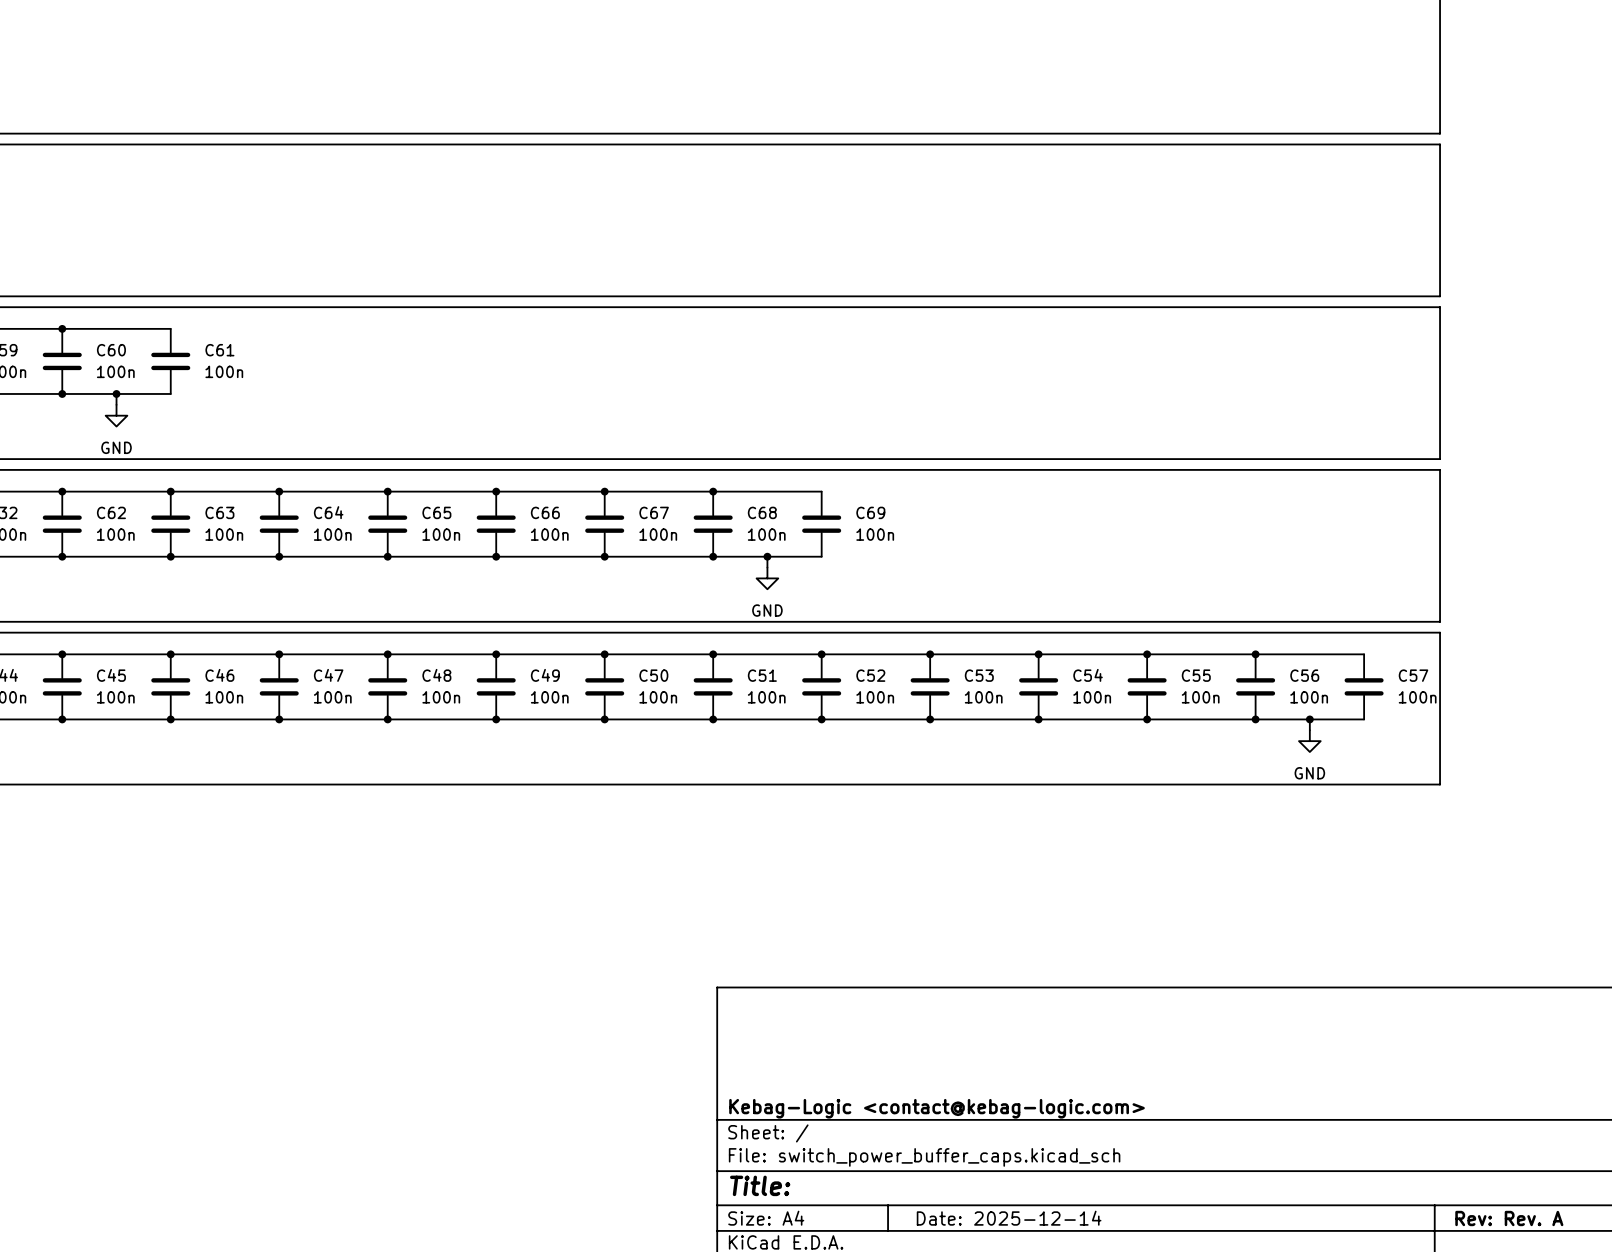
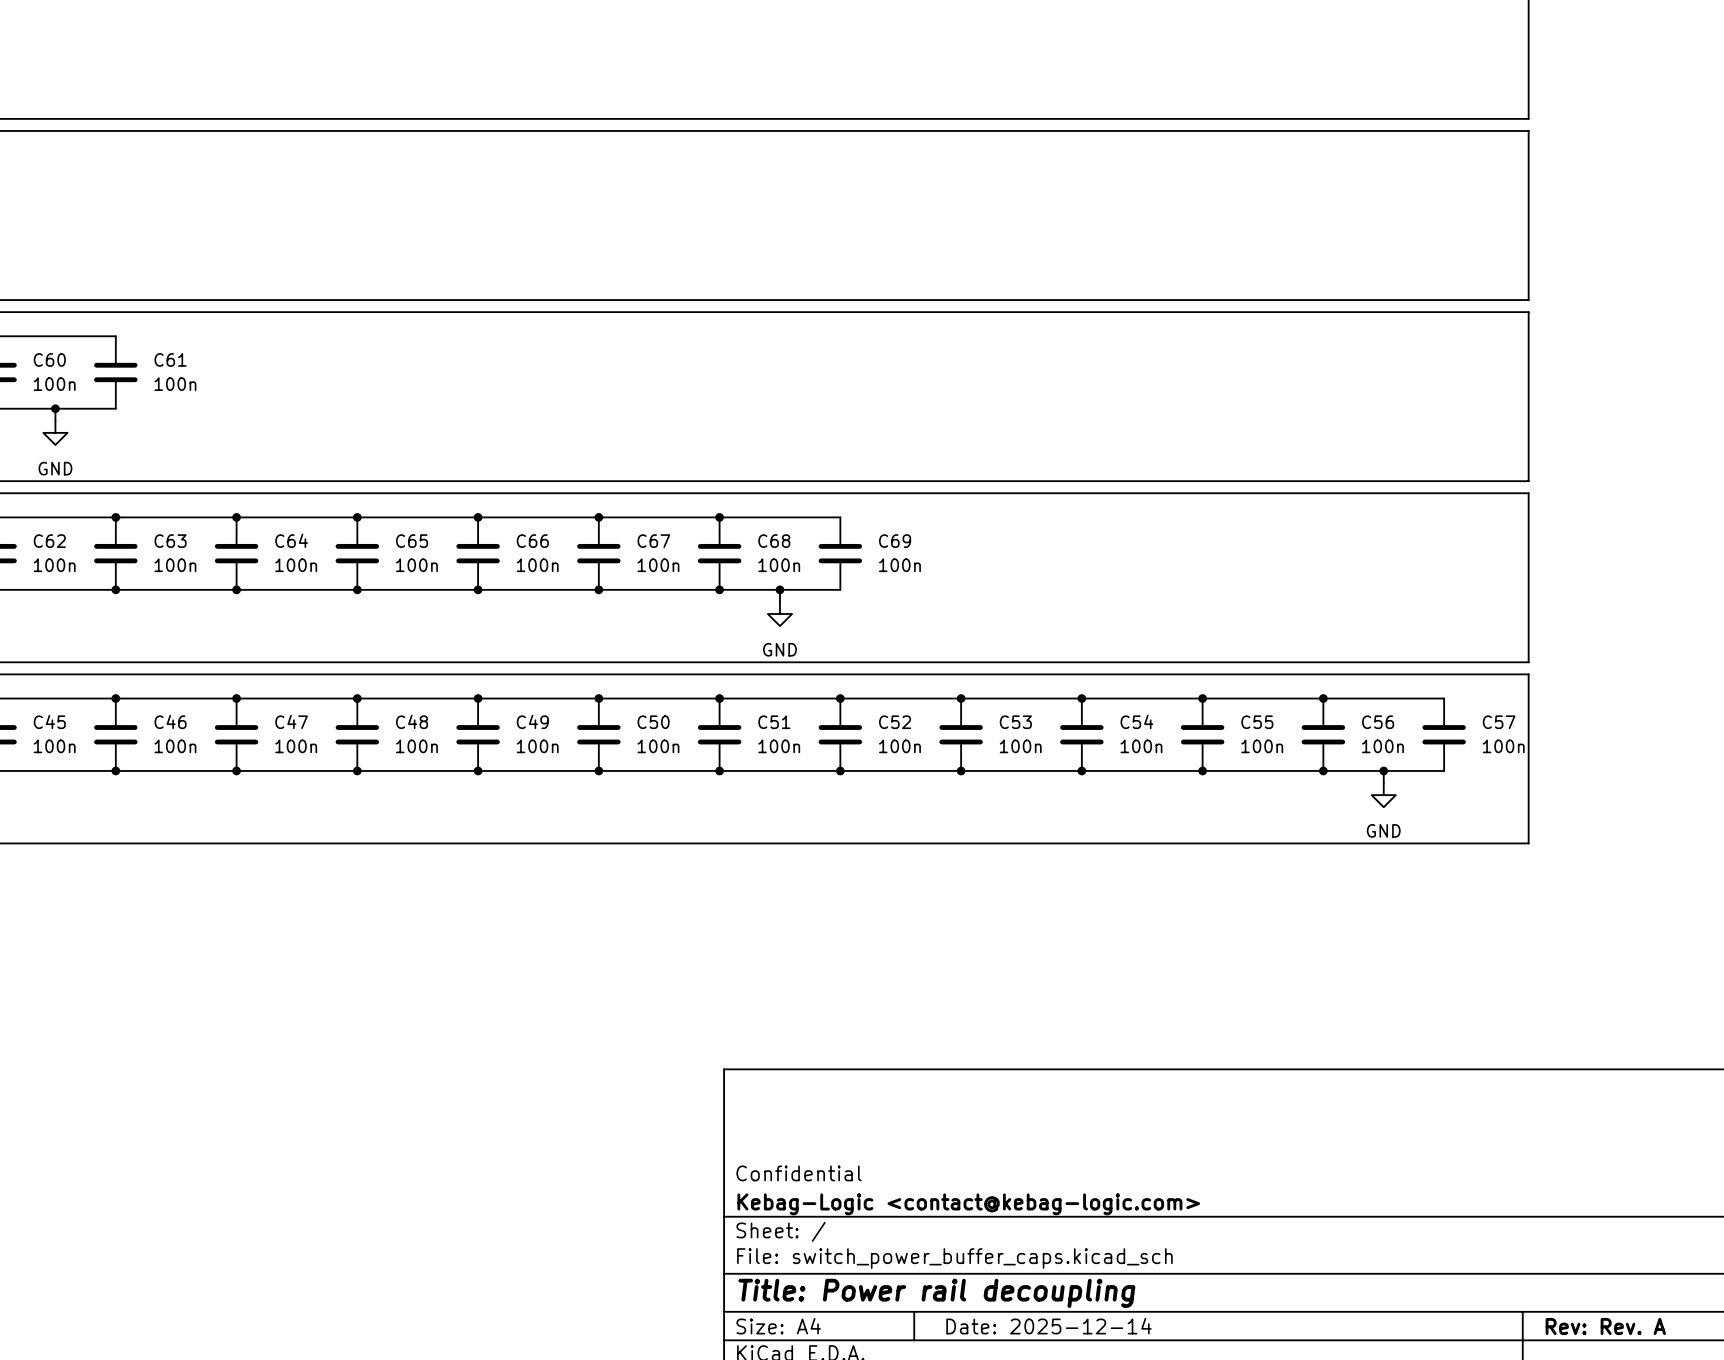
title block: none -> Confidential (799, 1173)
title block: Title: (760, 1185) -> Title: Power rail decoupling (936, 1293)

